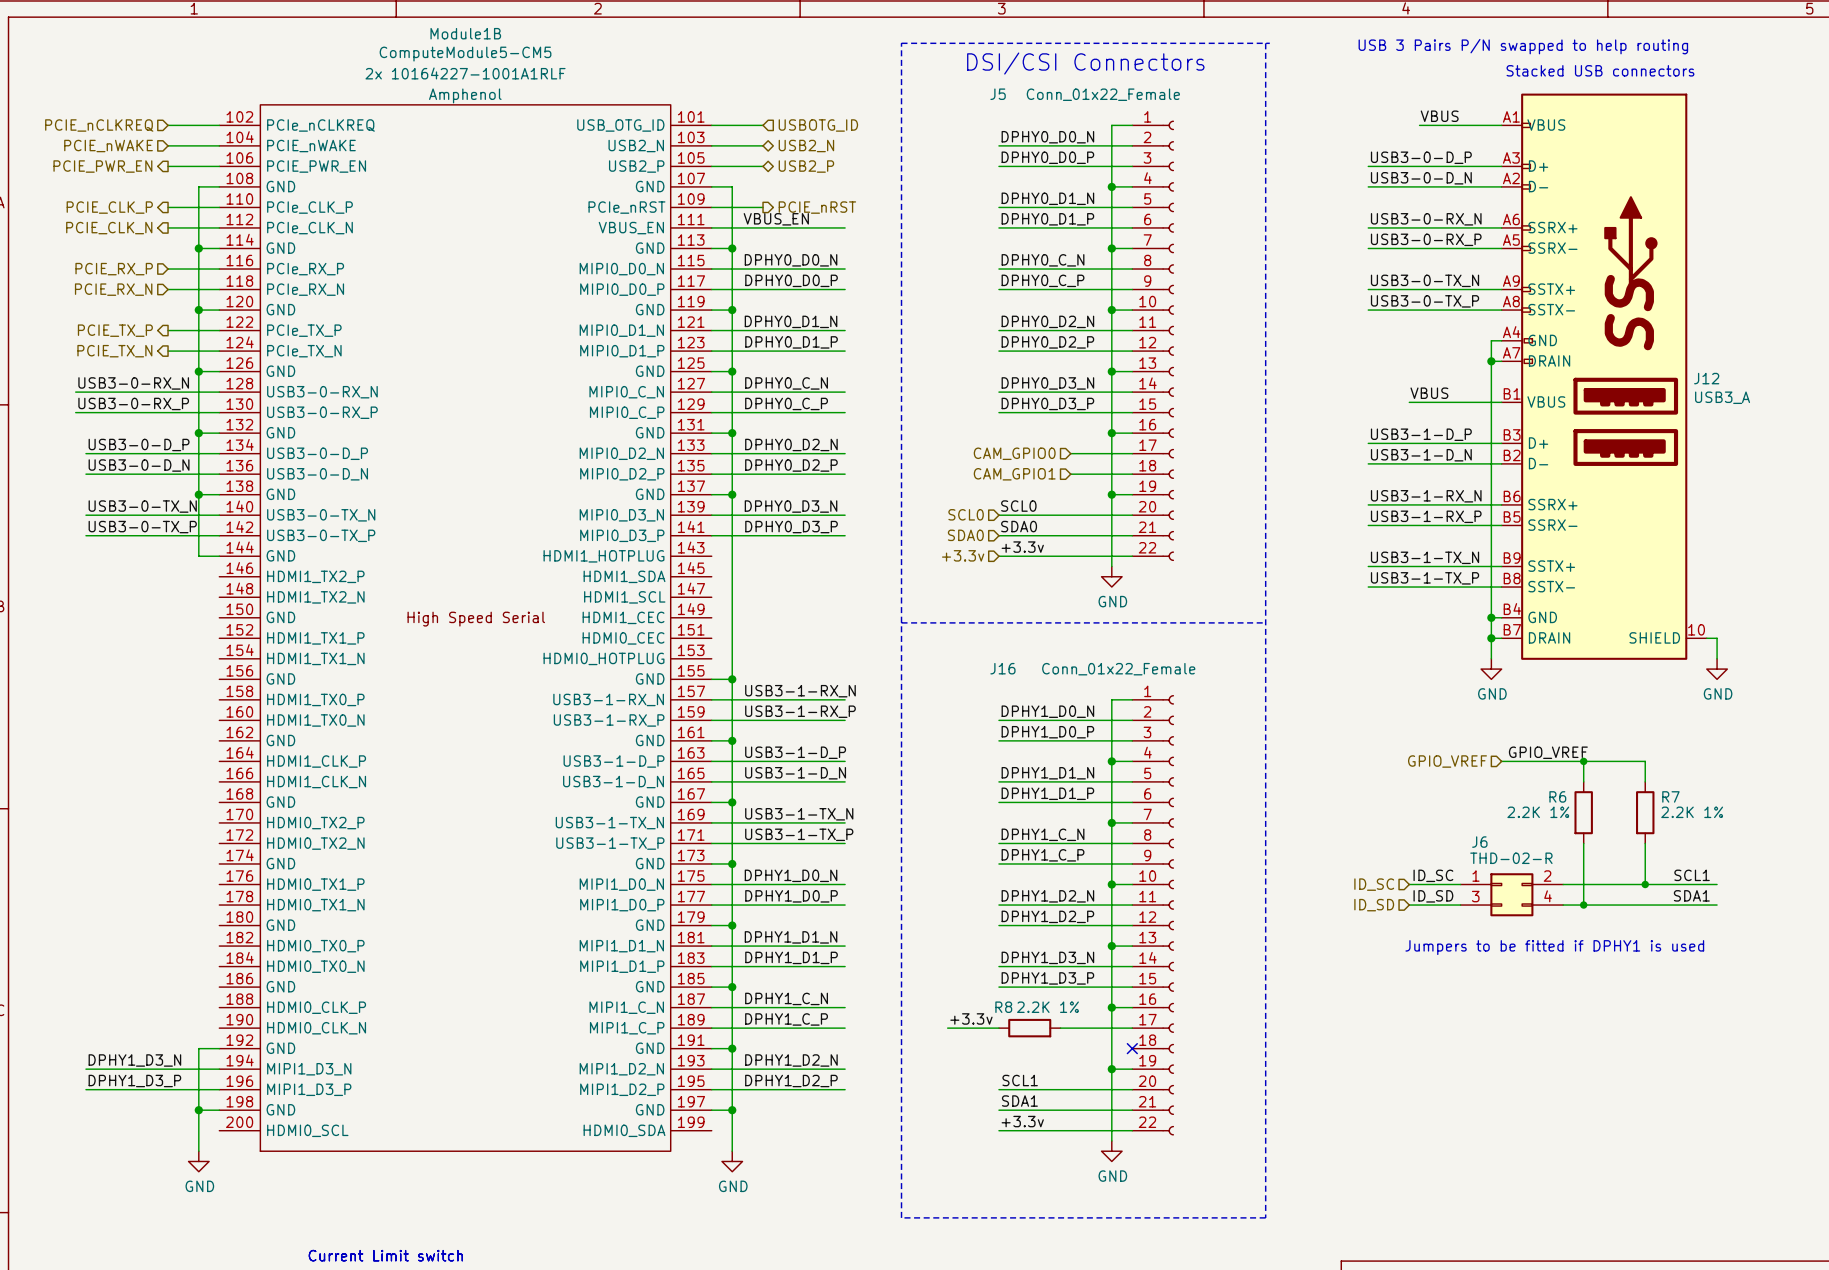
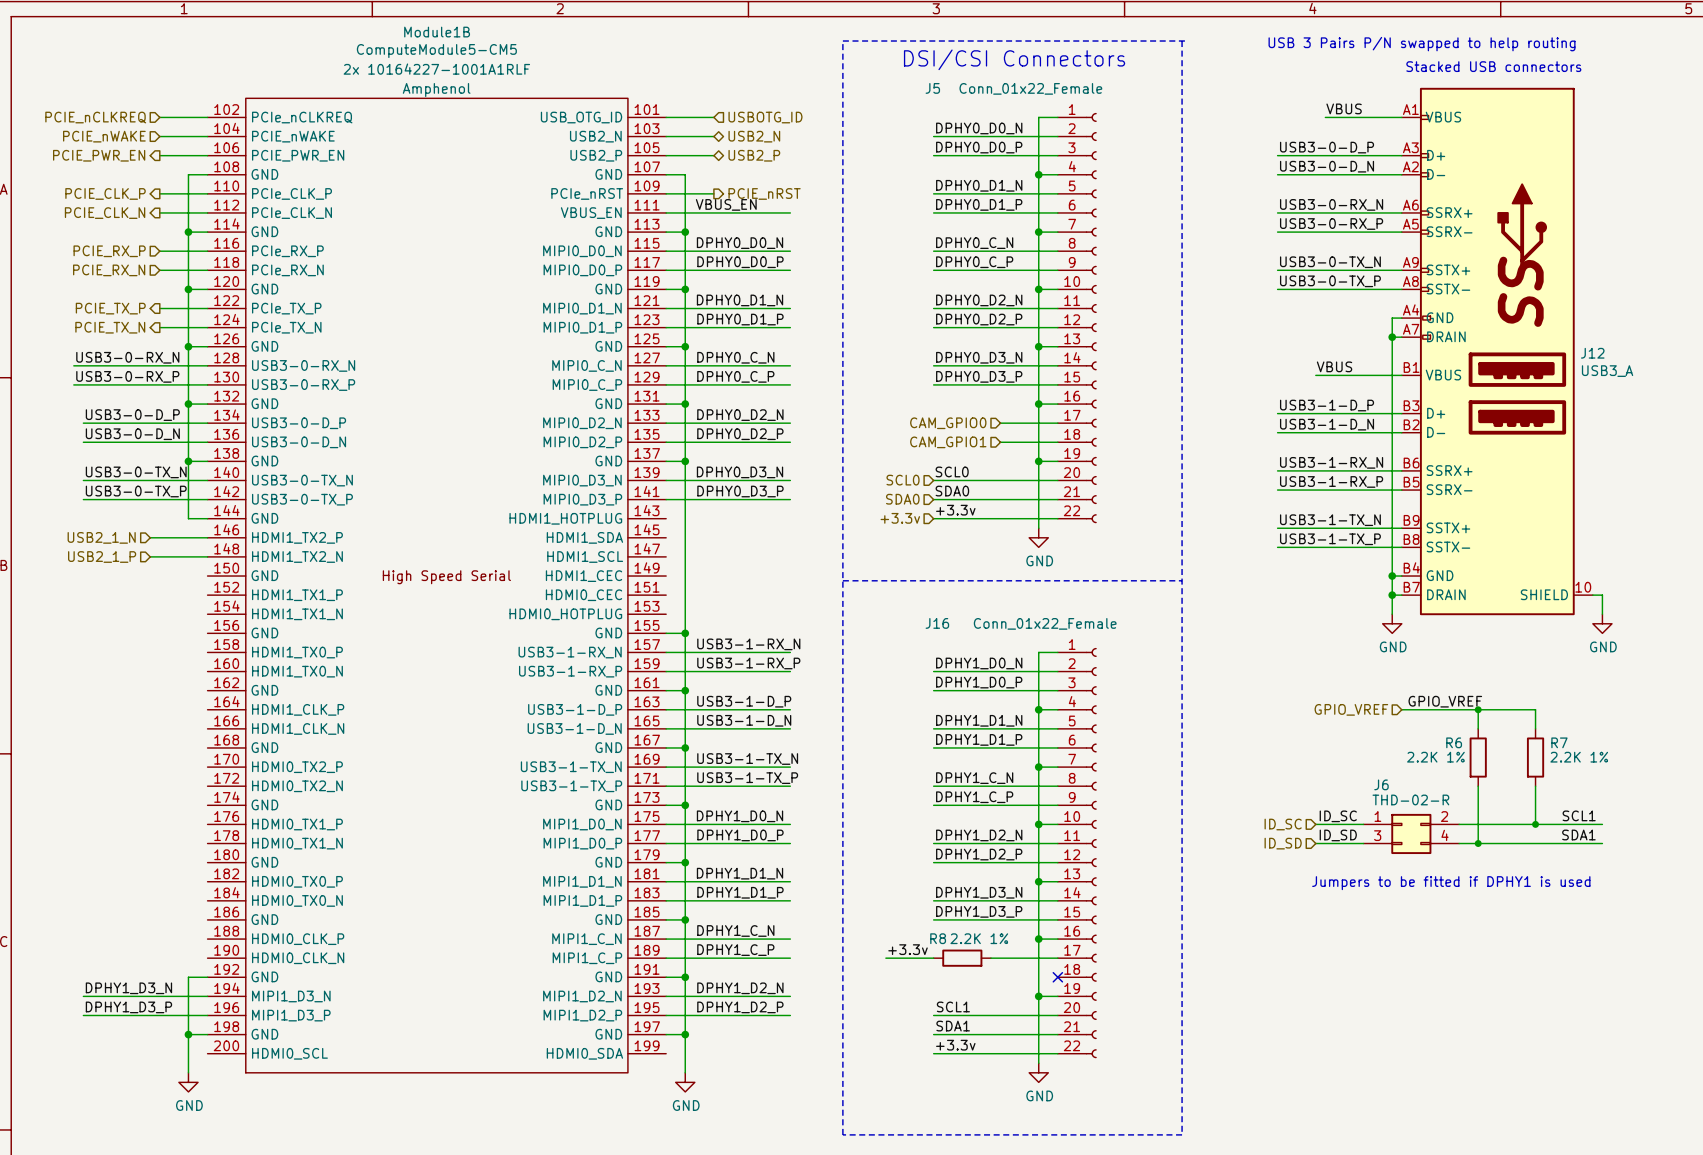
hierarchical label: none -> USB2_1_N (101, 537)
wire: none -> (150, 537) (207, 537)
hierarchical label: none -> USB2_1_P (102, 557)
wire: none -> (150, 556) (207, 556)

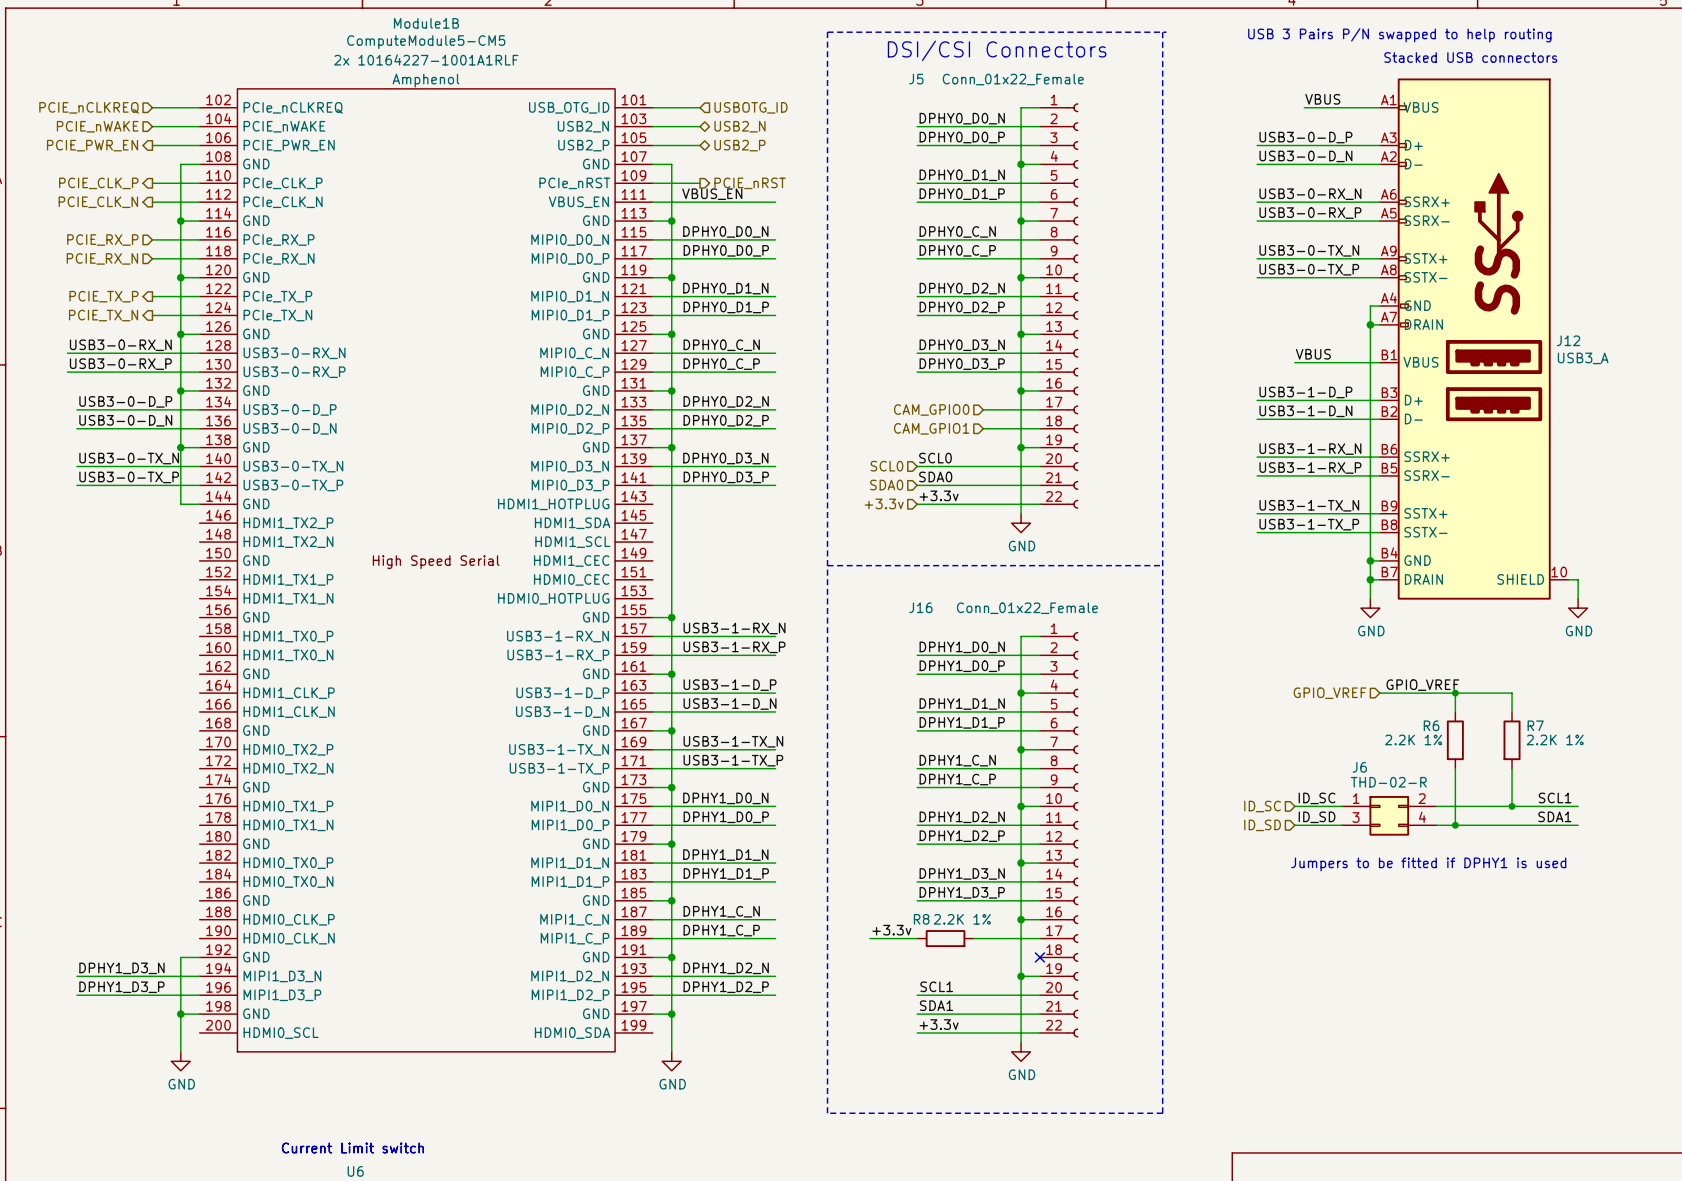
hierarchical label: USB2_1_N (101, 537) -> none
wire: (150, 537) (207, 537) -> none
wire: (150, 556) (207, 556) -> none
hierarchical label: USB2_1_P (102, 557) -> none

